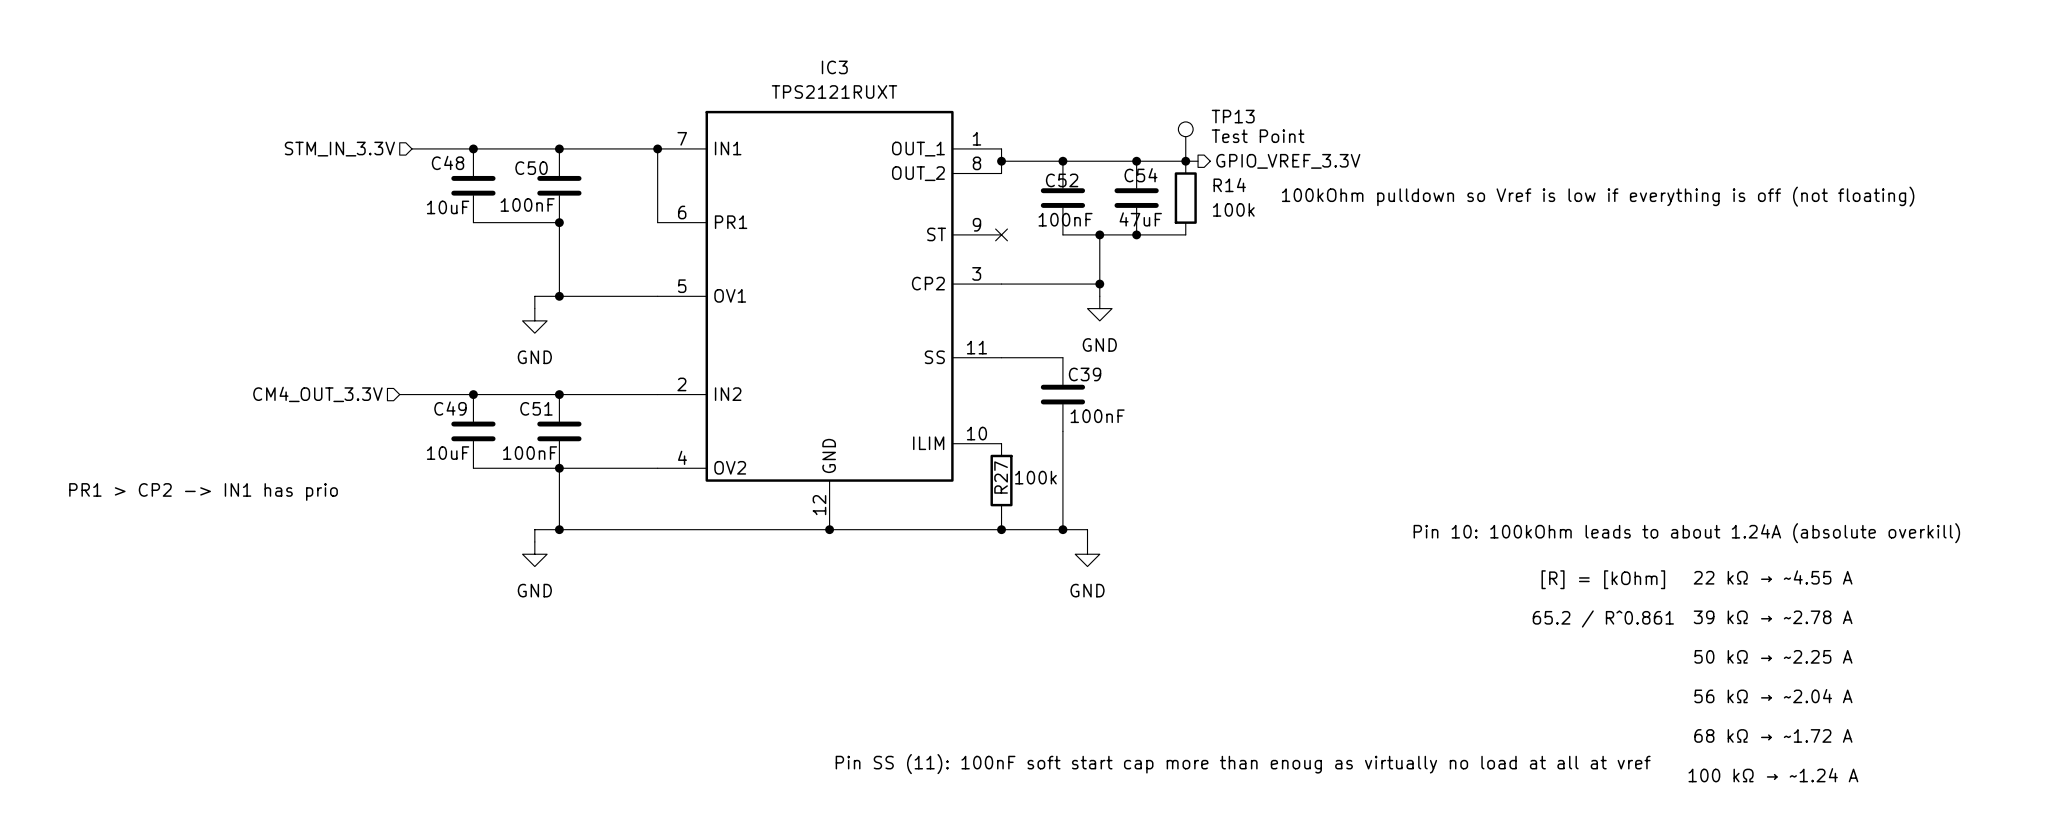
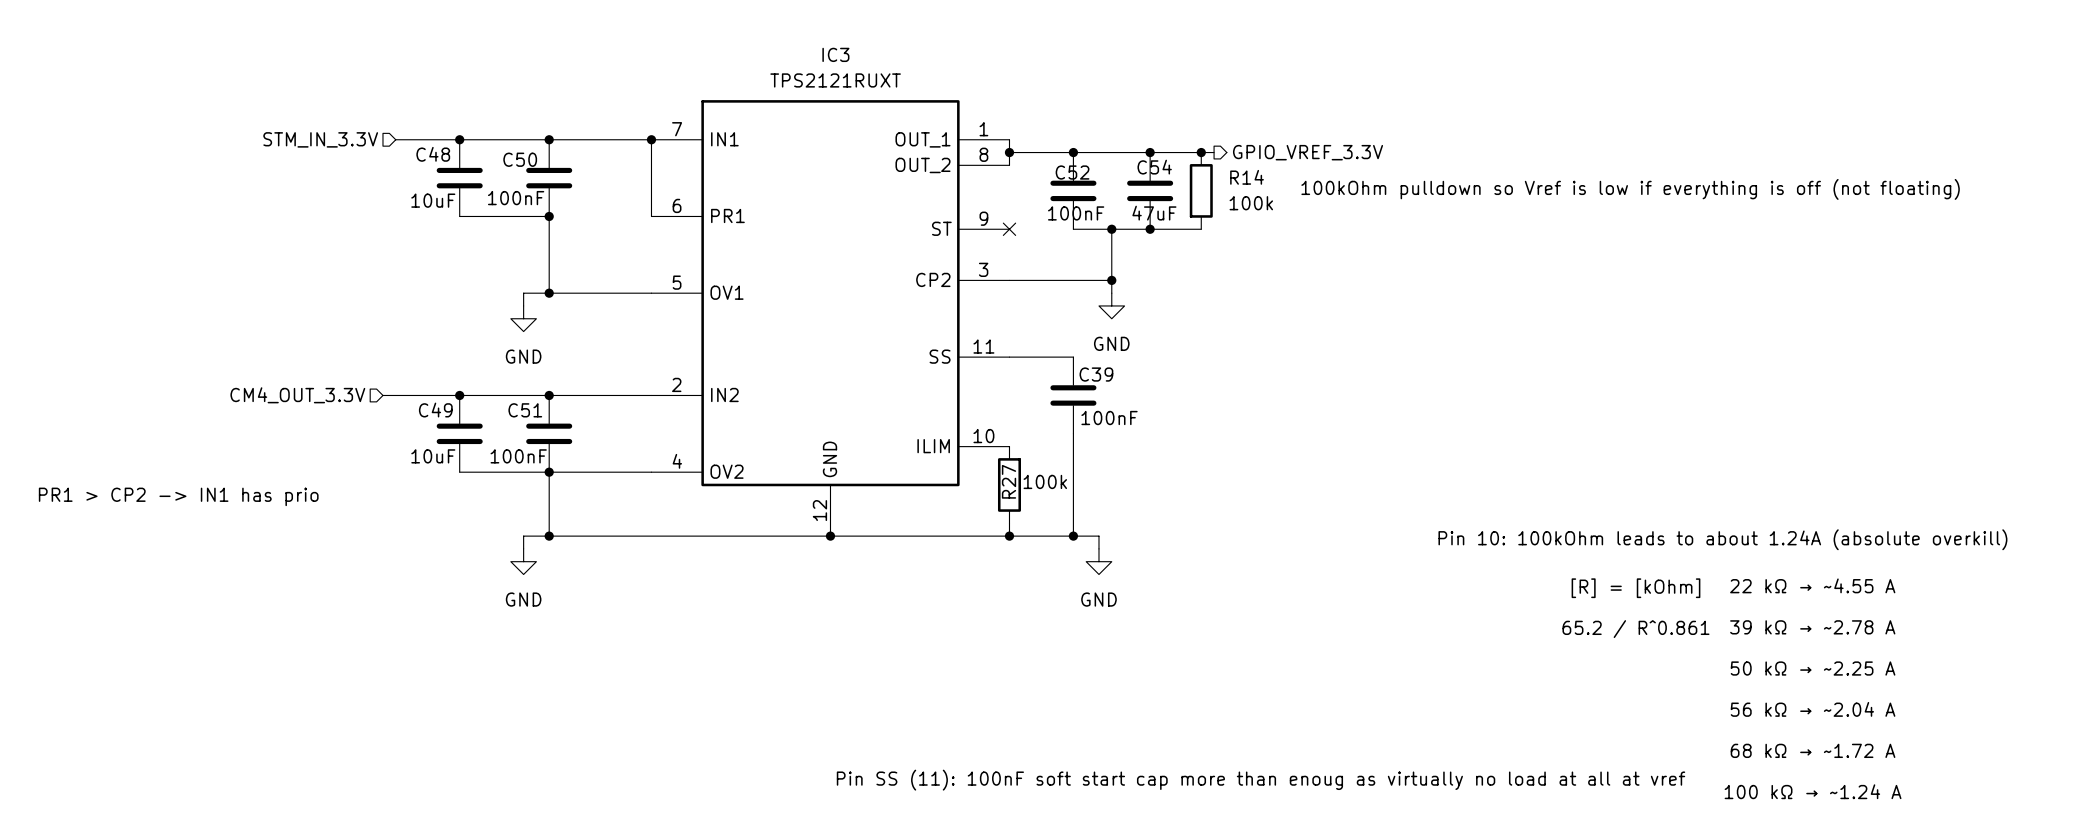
TP13: Test Point (1185, 141) -> none

